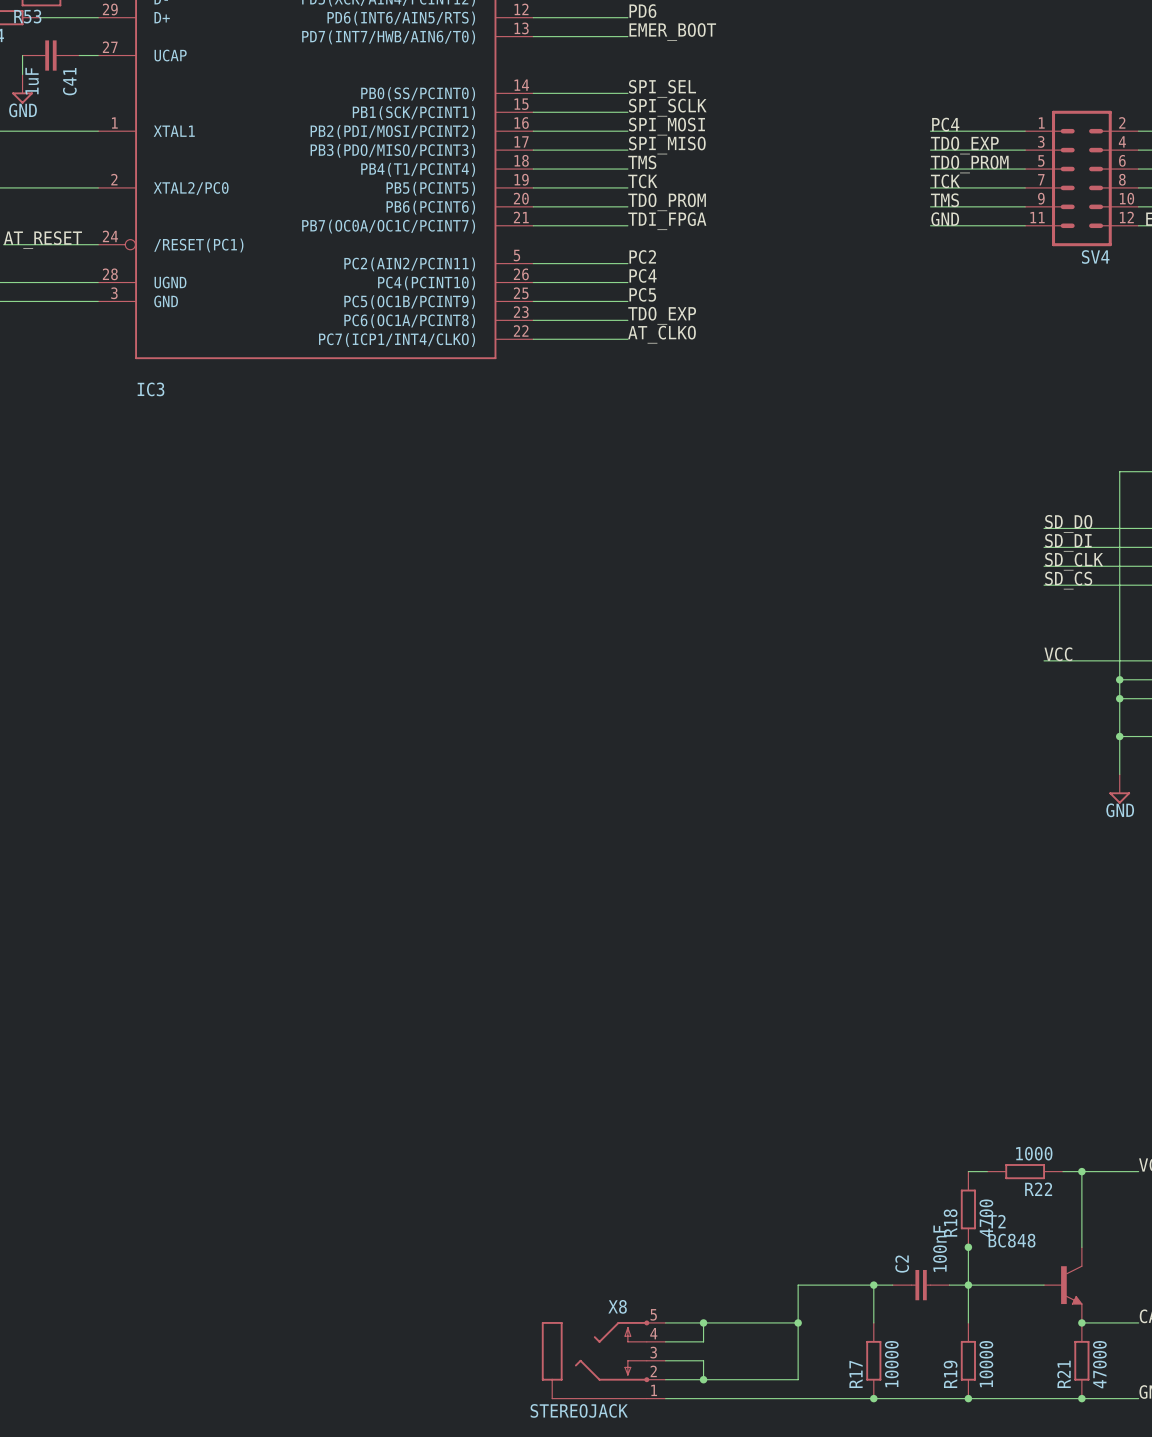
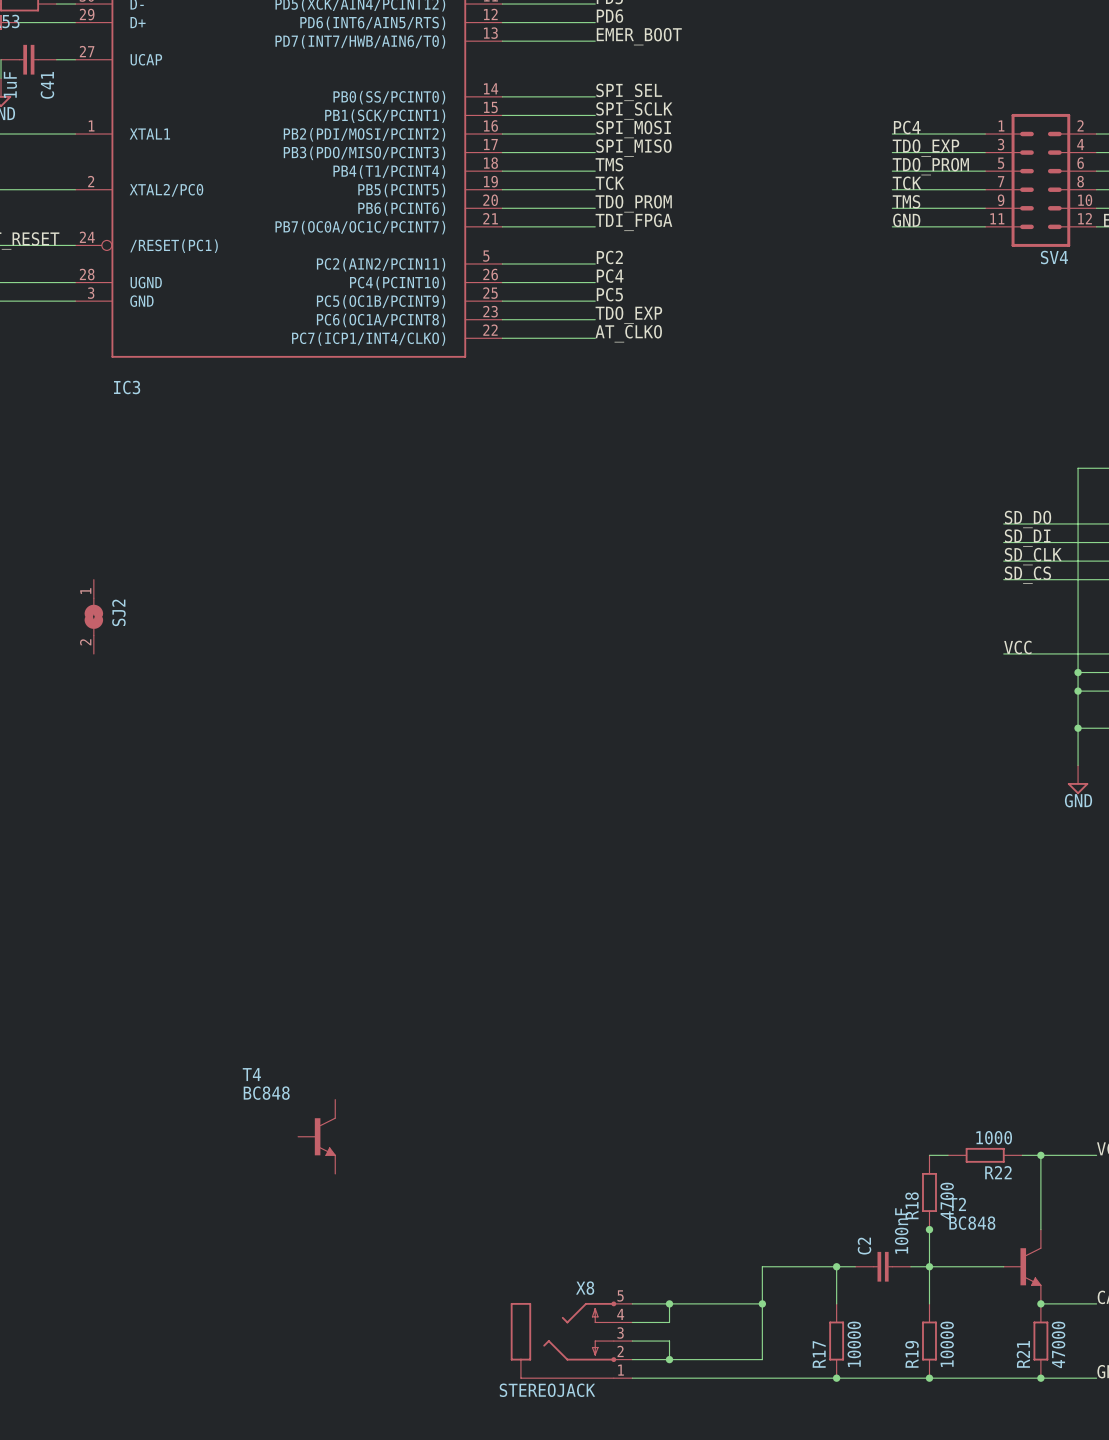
SJ2: none -> (93, 616)
T4: none -> BC848 (316, 1136)

